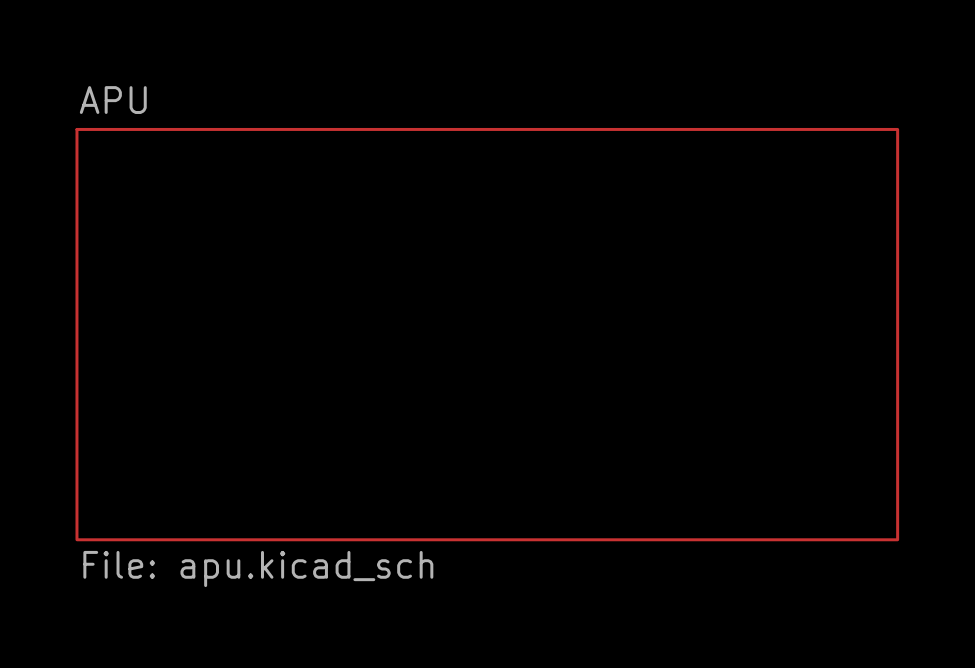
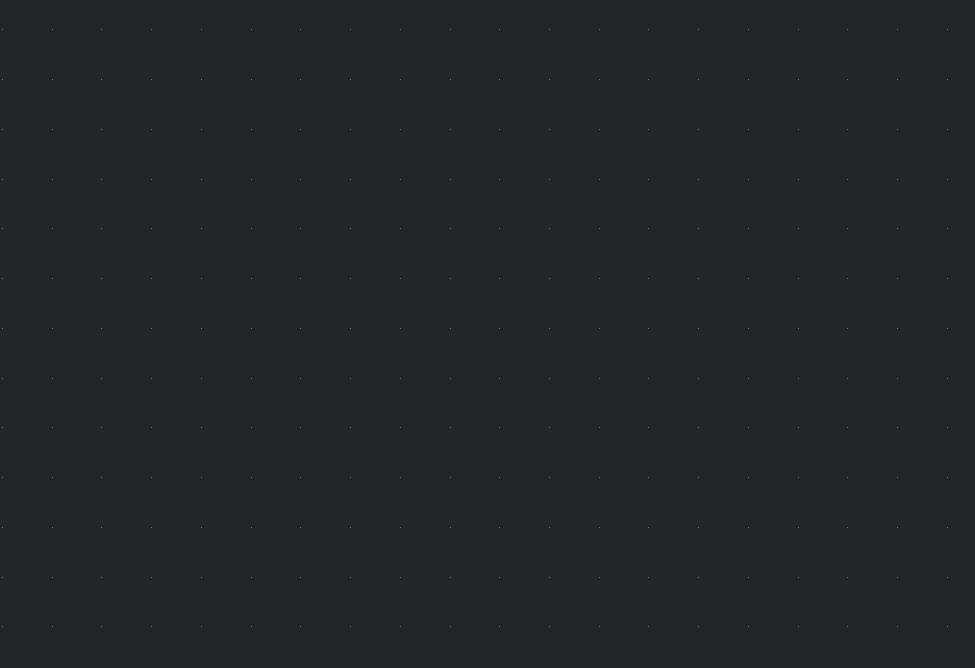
sheet APU: File: apu.kicad_sch (487, 334) -> none

